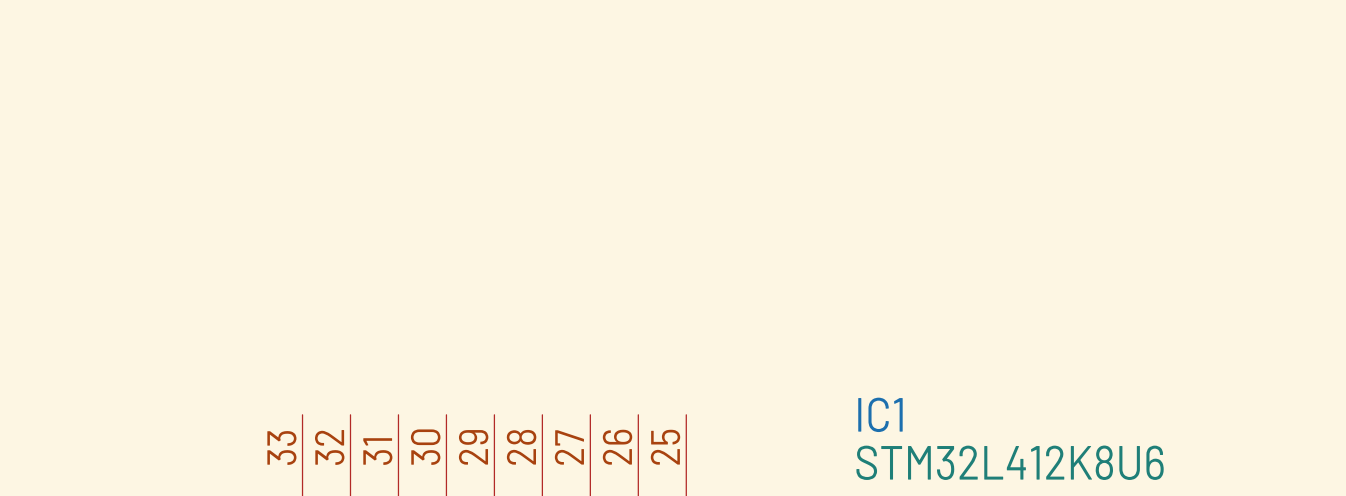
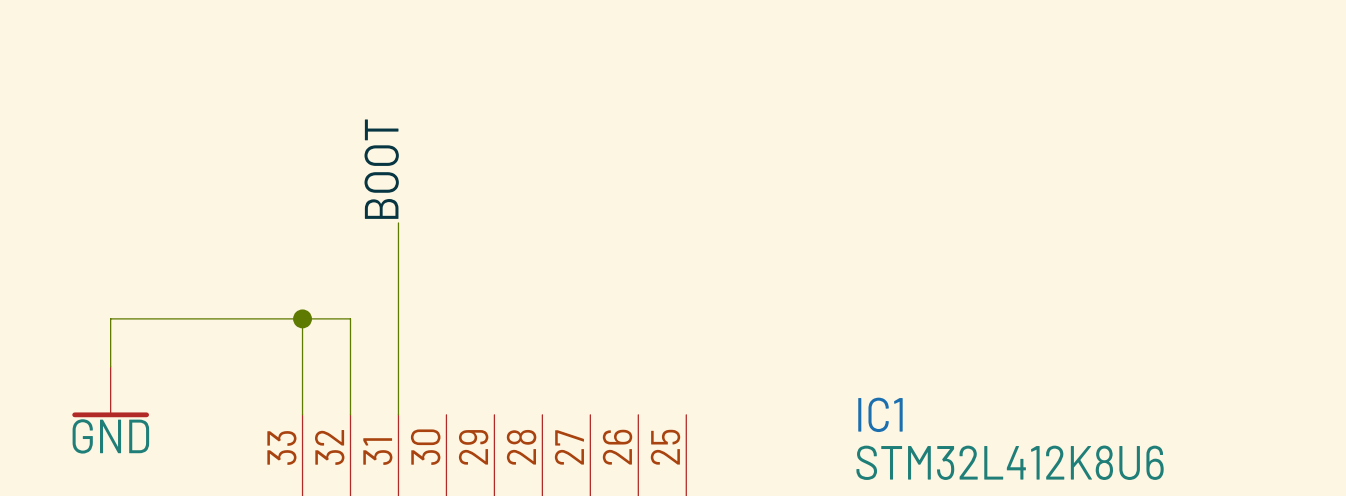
label: none -> BOOT (381, 169)
wire: none -> (398, 222) (398, 414)
wire: none -> (302, 318) (302, 414)
junction: none -> (302, 318)
wire: none -> (110, 366) (110, 318) (350, 318) (350, 414)
power symbol: none -> GND (110, 392)

